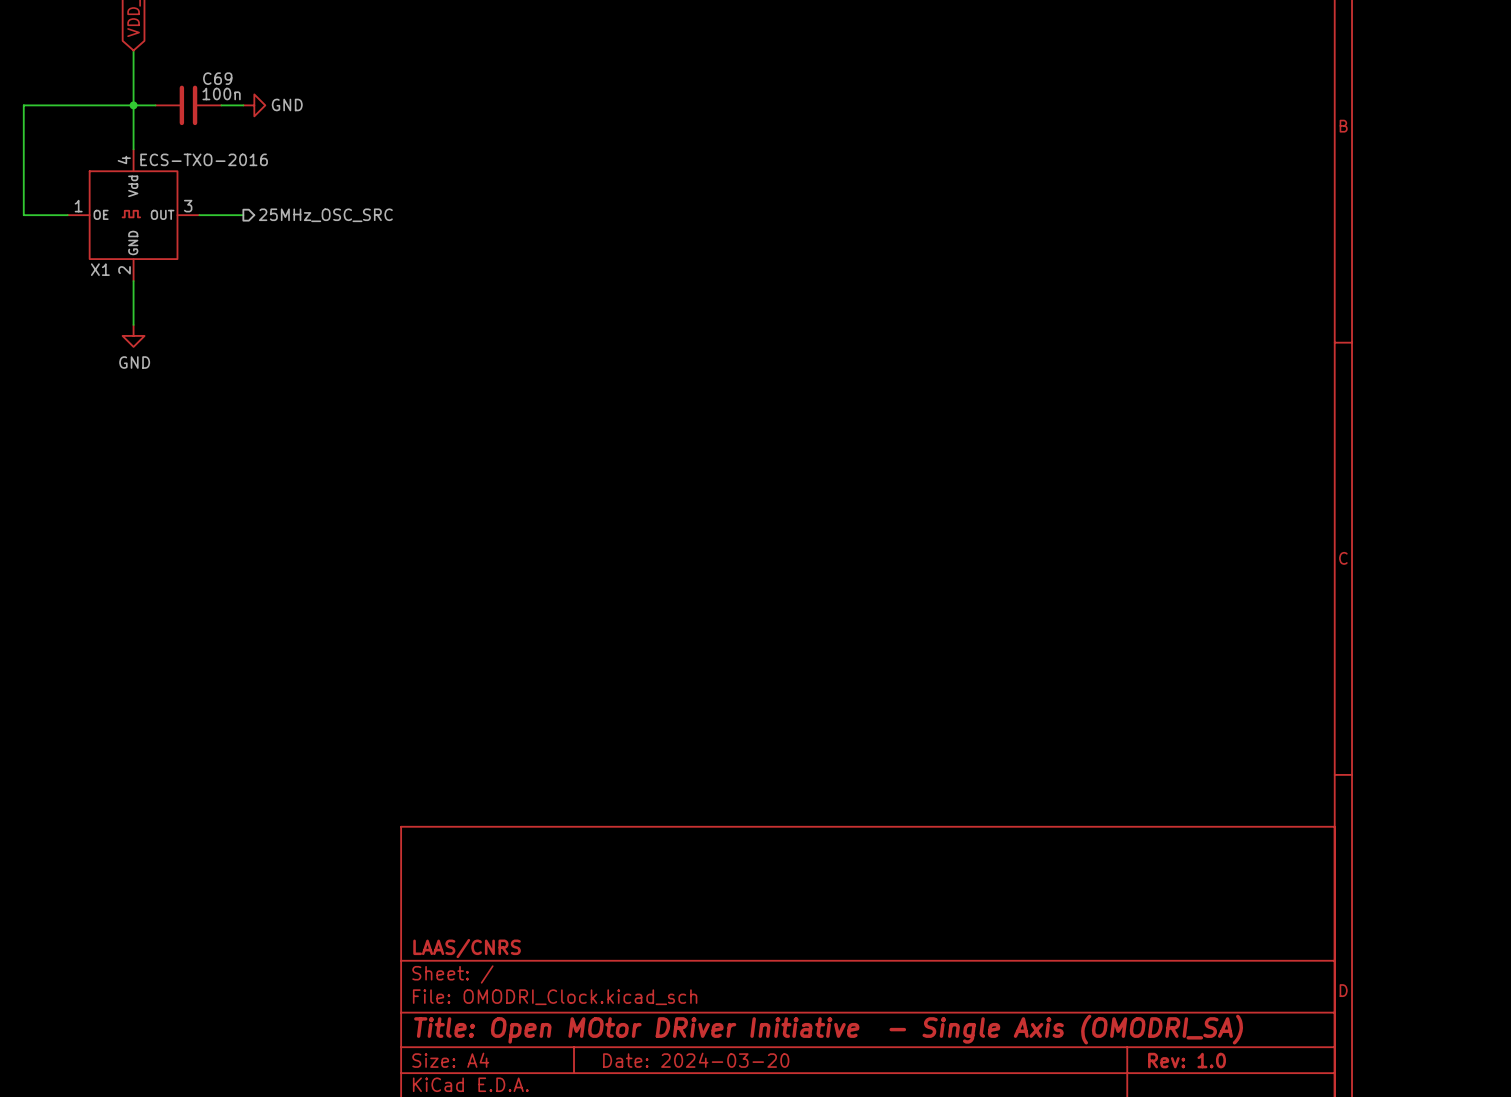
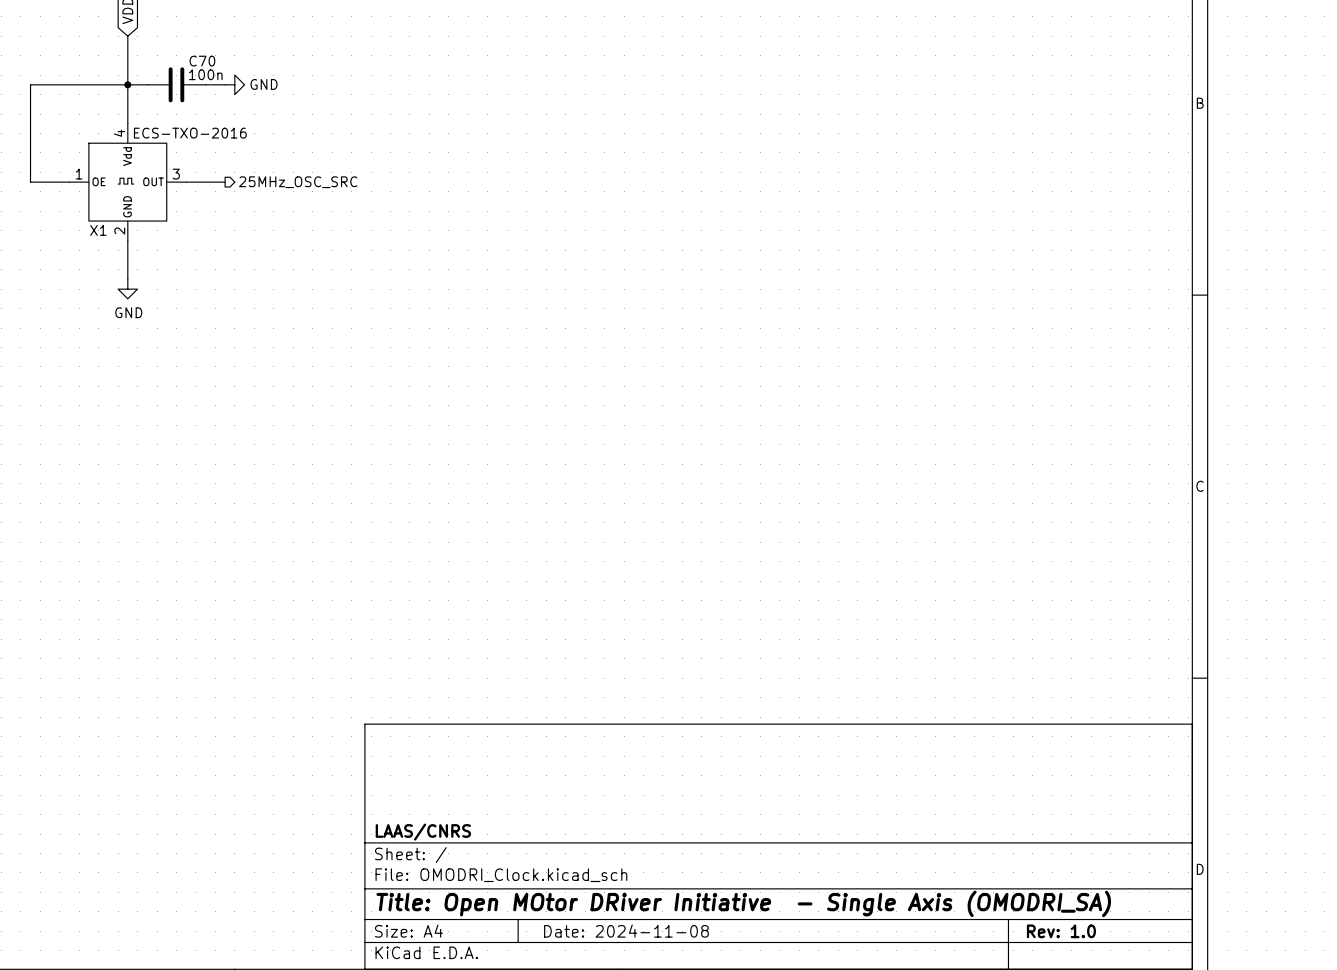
C69 name: C69 (217, 78) -> C70 (202, 61)
title block: Date: 2024-03-20 (696, 1060) -> Date: 2024-11-08 (626, 931)

